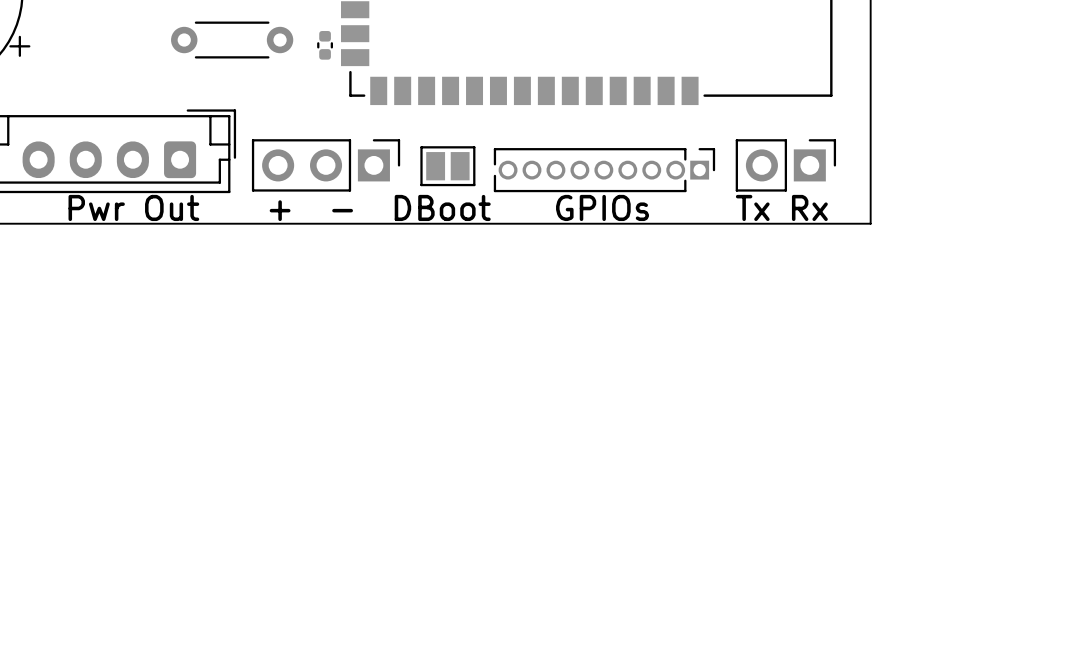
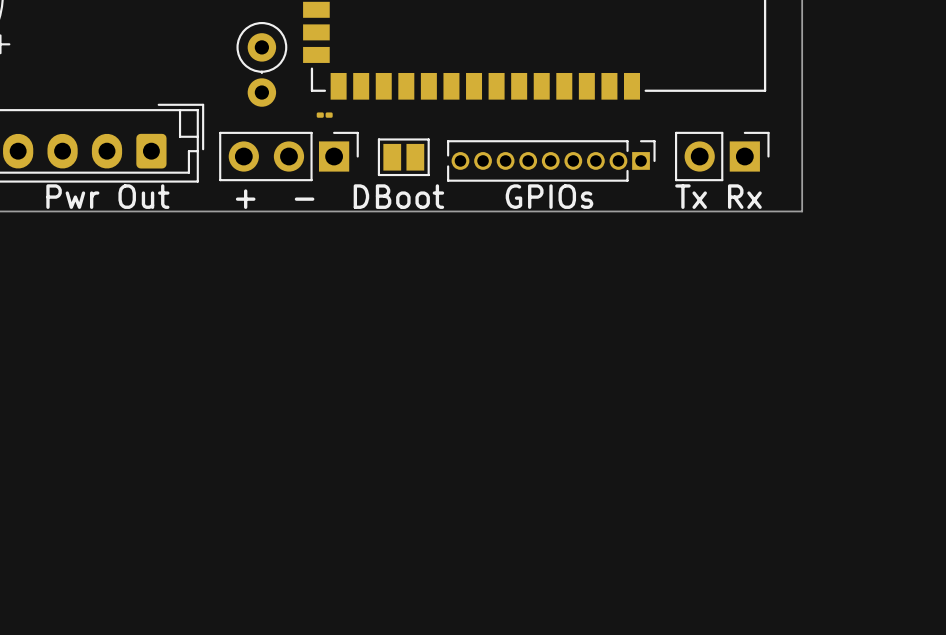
part: (232, 40) -> none
part: (325, 45) -> none
part: none -> (261, 64)
part: none -> (324, 115)

